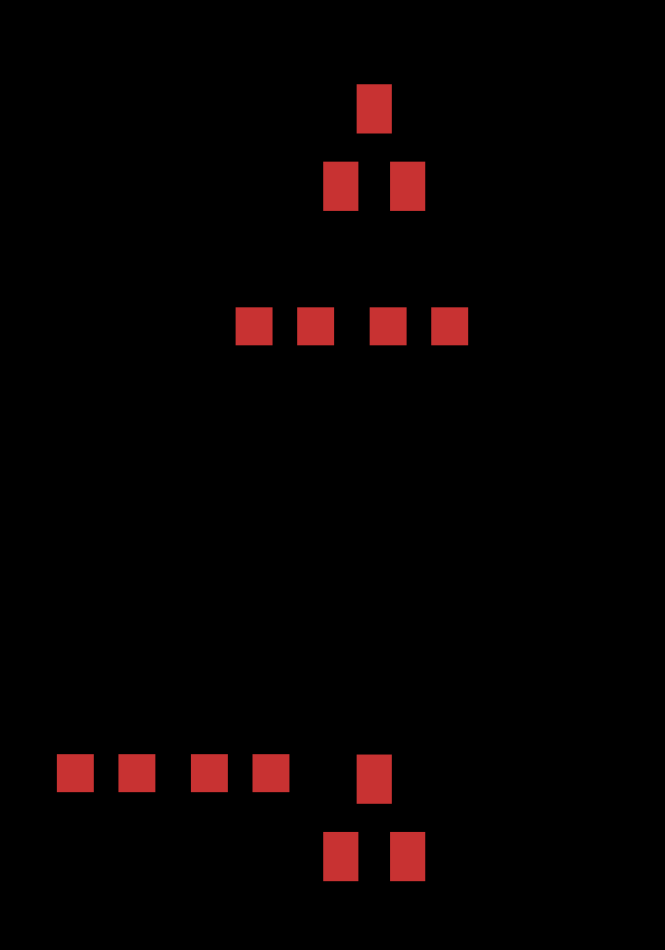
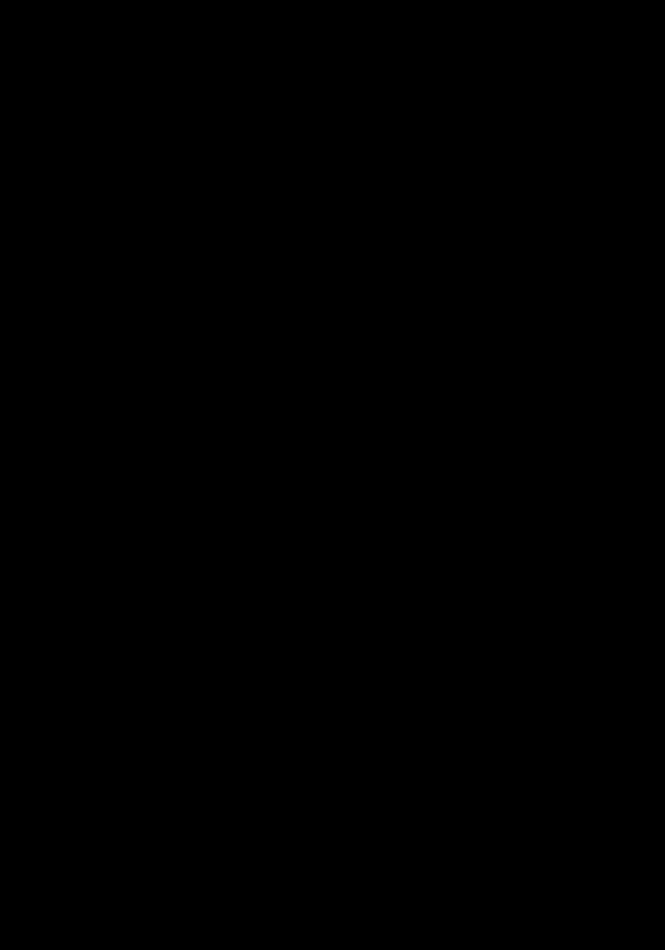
part: (374, 147) -> none
part: (284, 326) -> none
part: (418, 326) -> none
part: (106, 773) -> none
part: (240, 773) -> none
part: (374, 817) -> none

